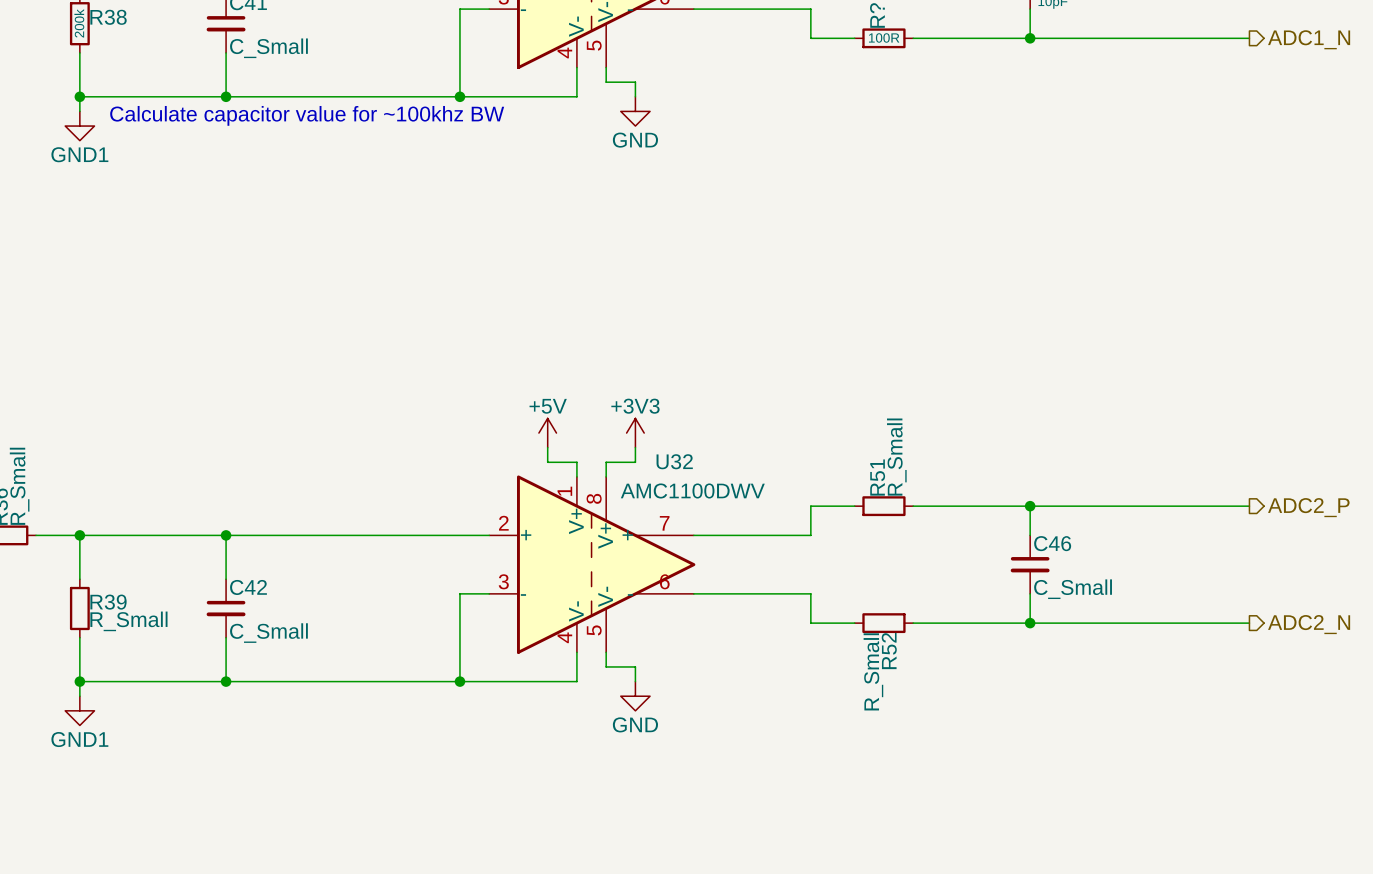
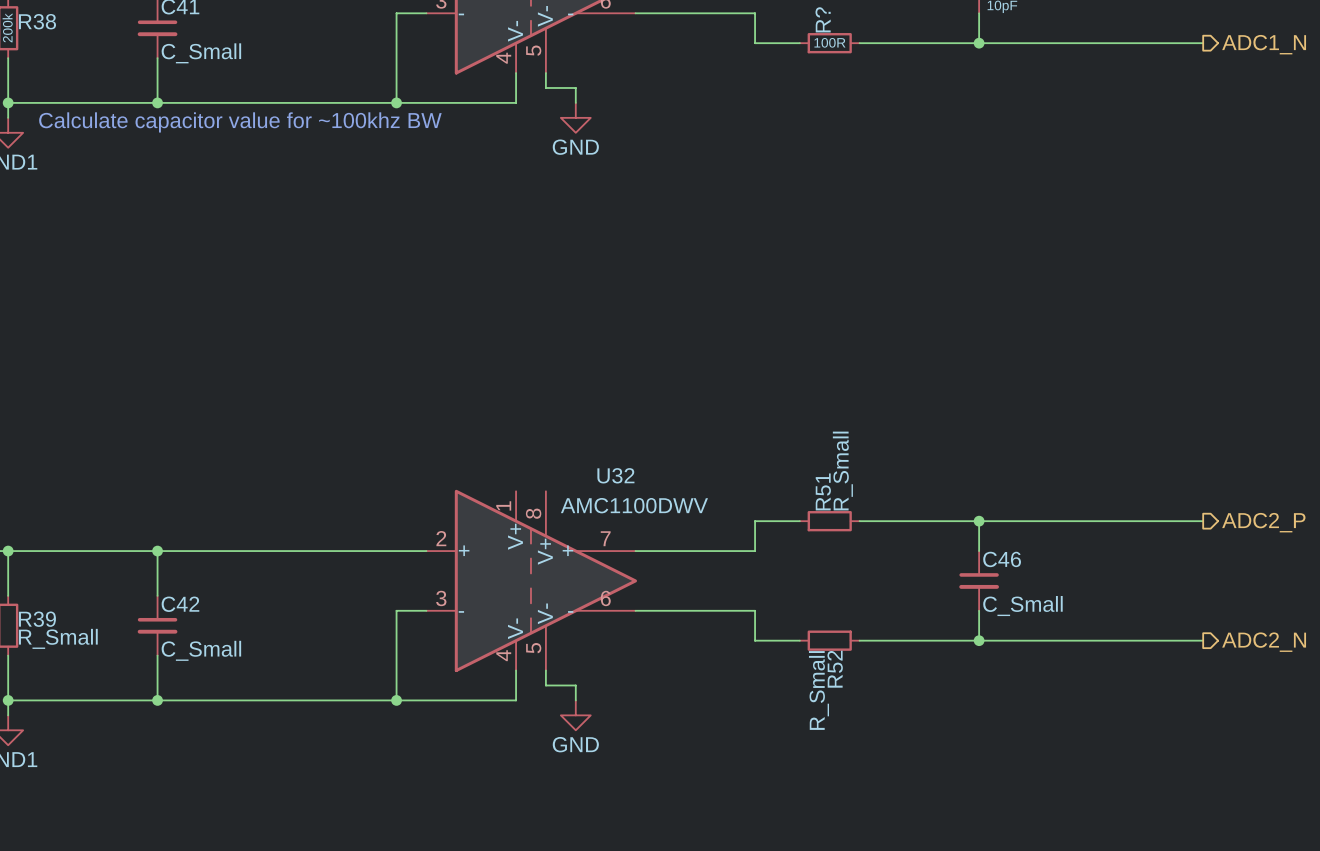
power symbol: +5V (547, 433) -> none
power symbol: +3V3 (635, 433) -> none
wire: (547, 447) (547, 462) (576, 462) (576, 476) -> none
wire: (635, 447) (635, 462) (606, 462) (606, 476) -> none

